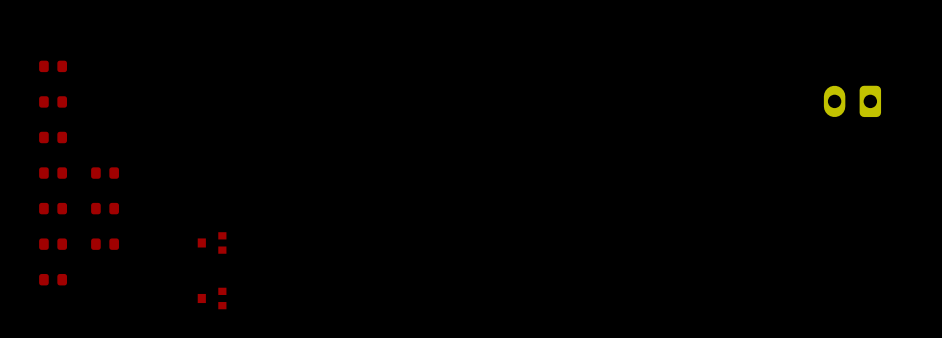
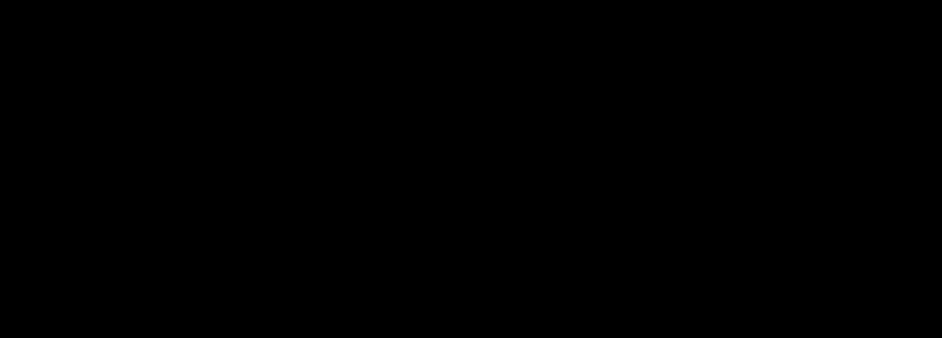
part: (53, 66) -> none
part: (53, 101) -> none
part: (852, 101) -> none
part: (53, 137) -> none
part: (53, 173) -> none
part: (105, 173) -> none
part: (53, 208) -> none
part: (105, 208) -> none
part: (212, 242) -> none
part: (53, 244) -> none
part: (105, 244) -> none
part: (53, 279) -> none
part: (212, 298) -> none

